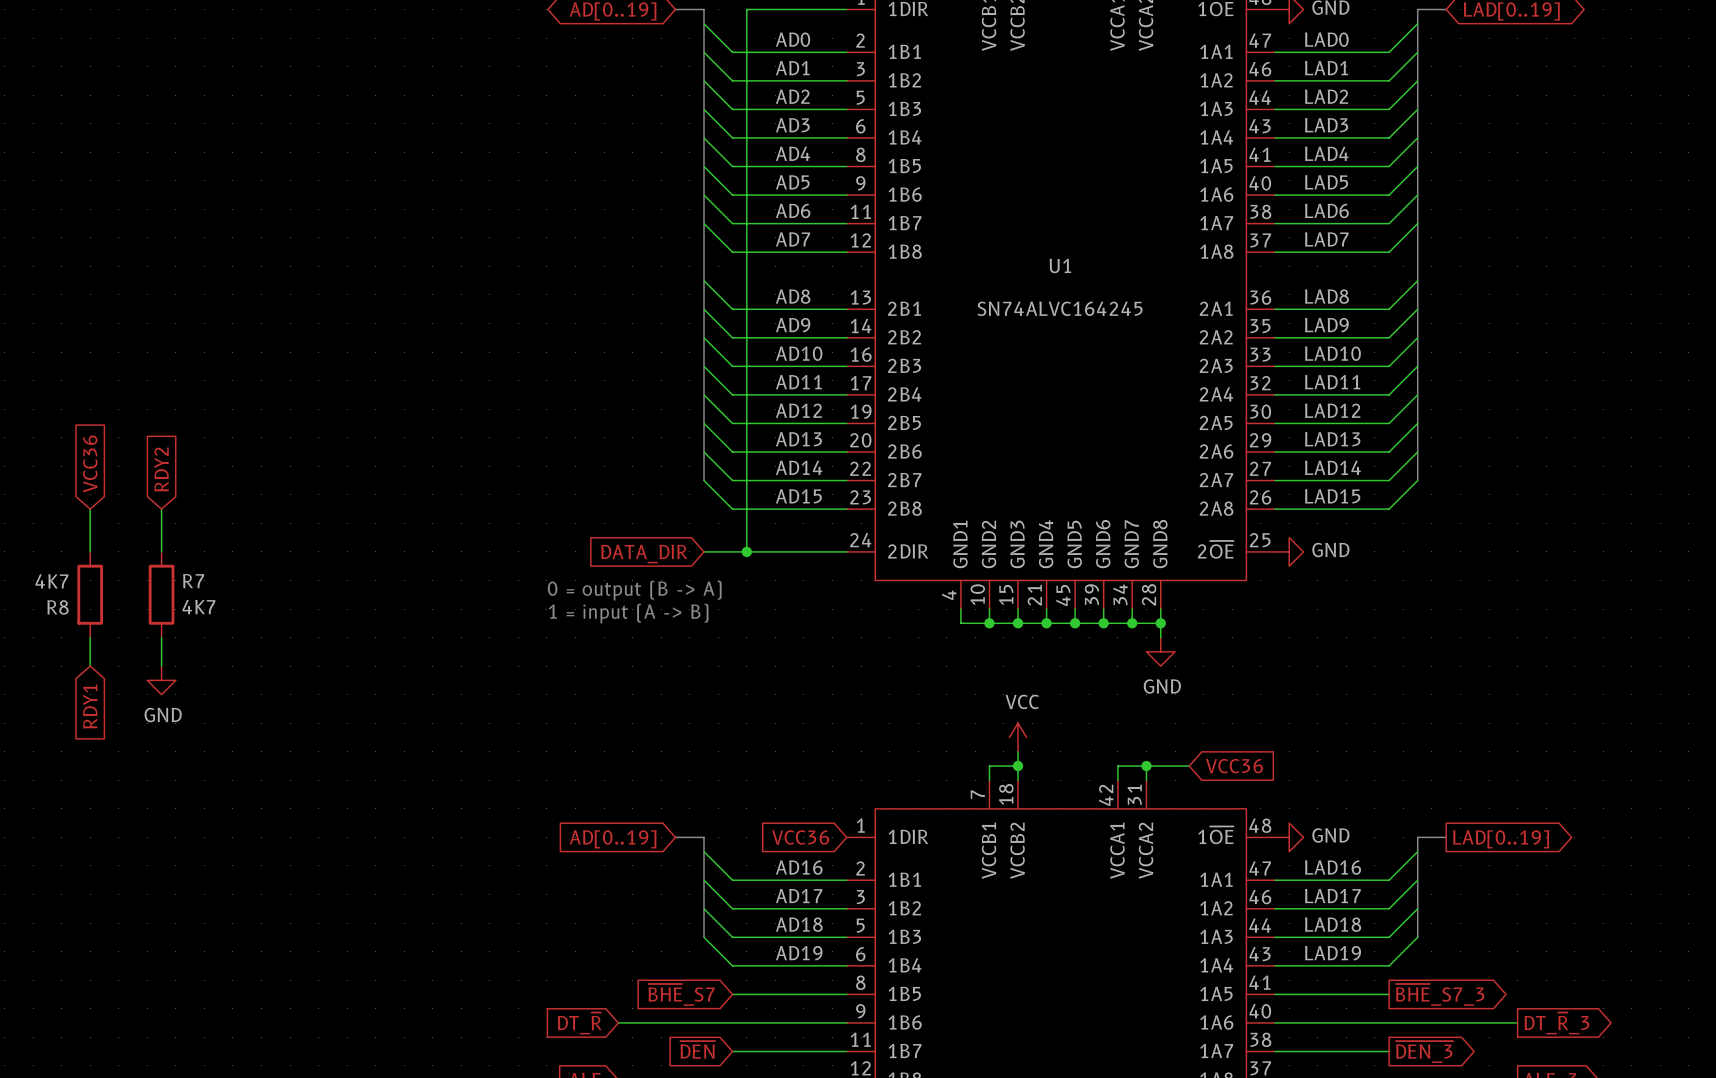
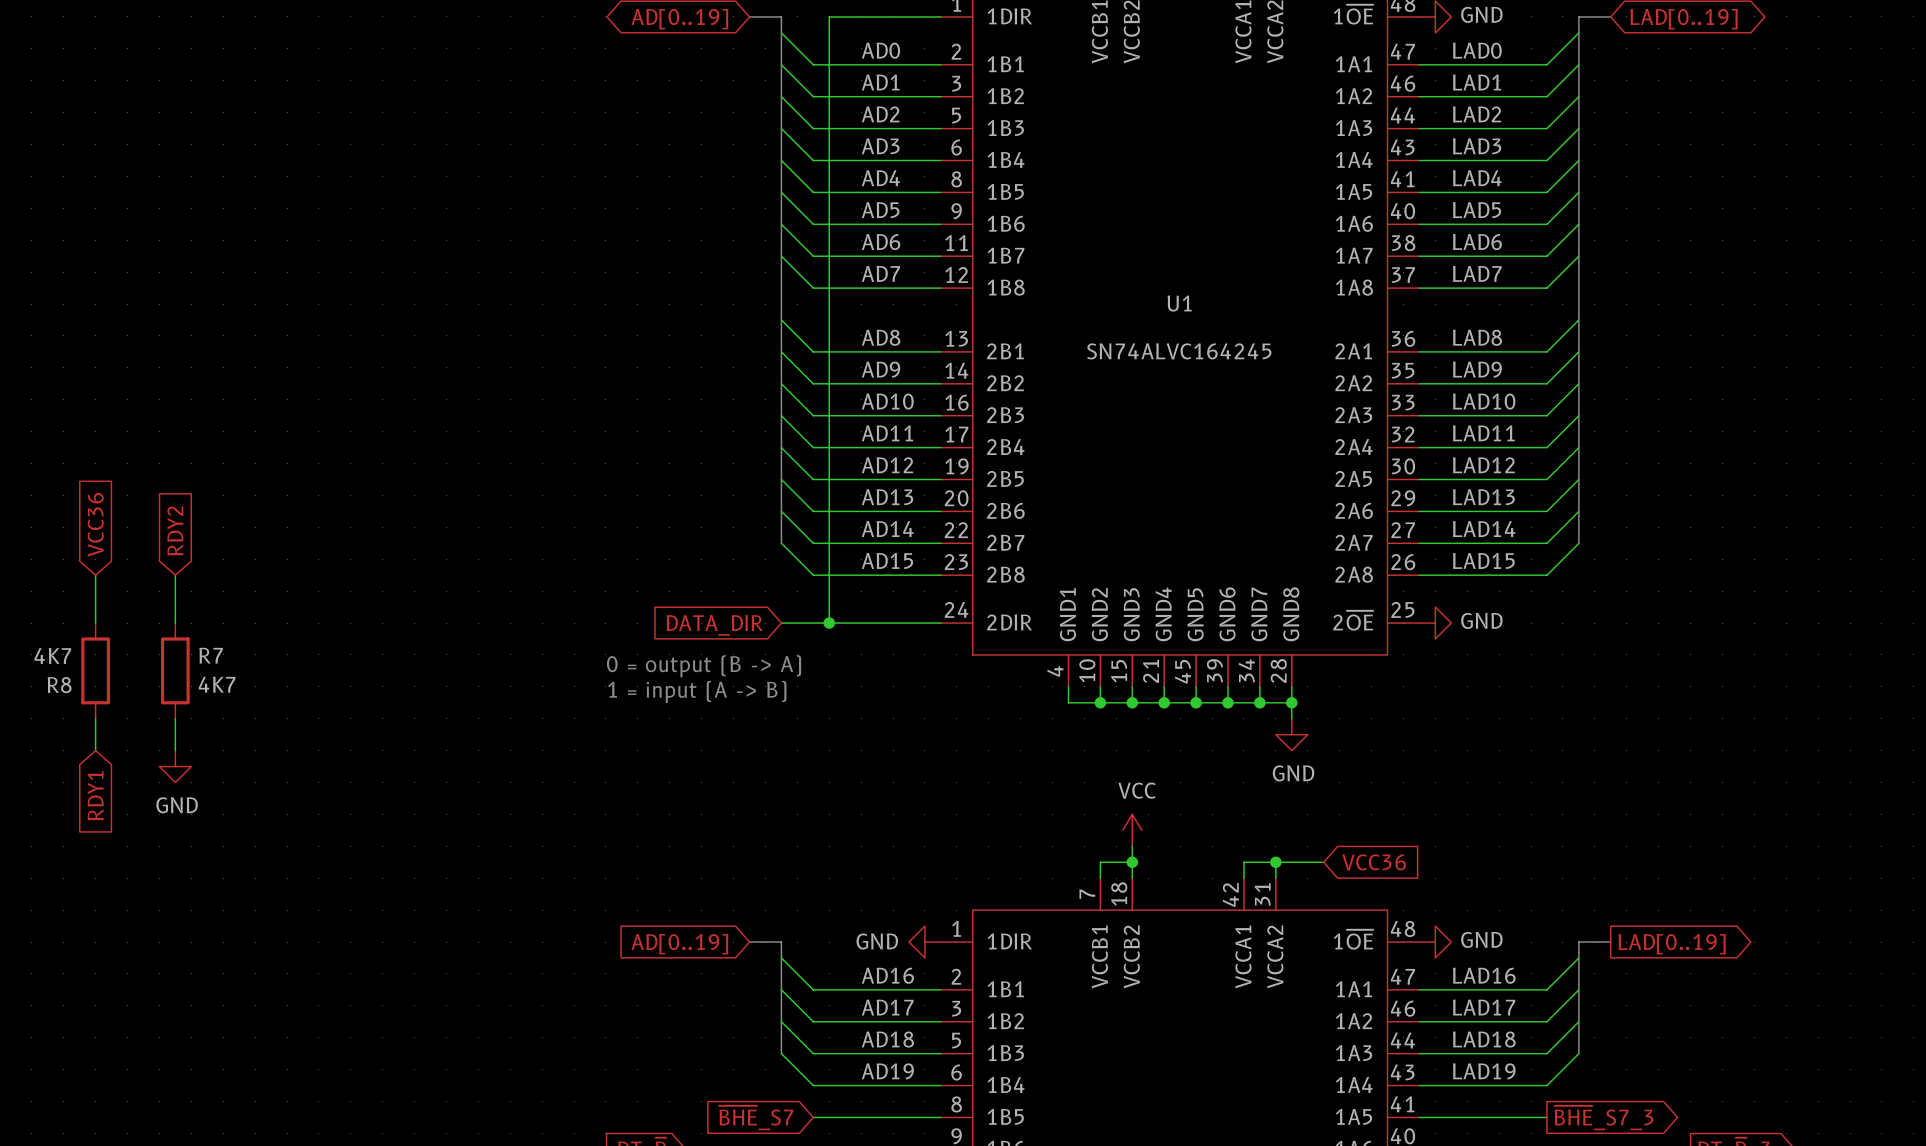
global label: VCC36 (800, 837) -> none
power symbol: none -> GND (924, 942)

